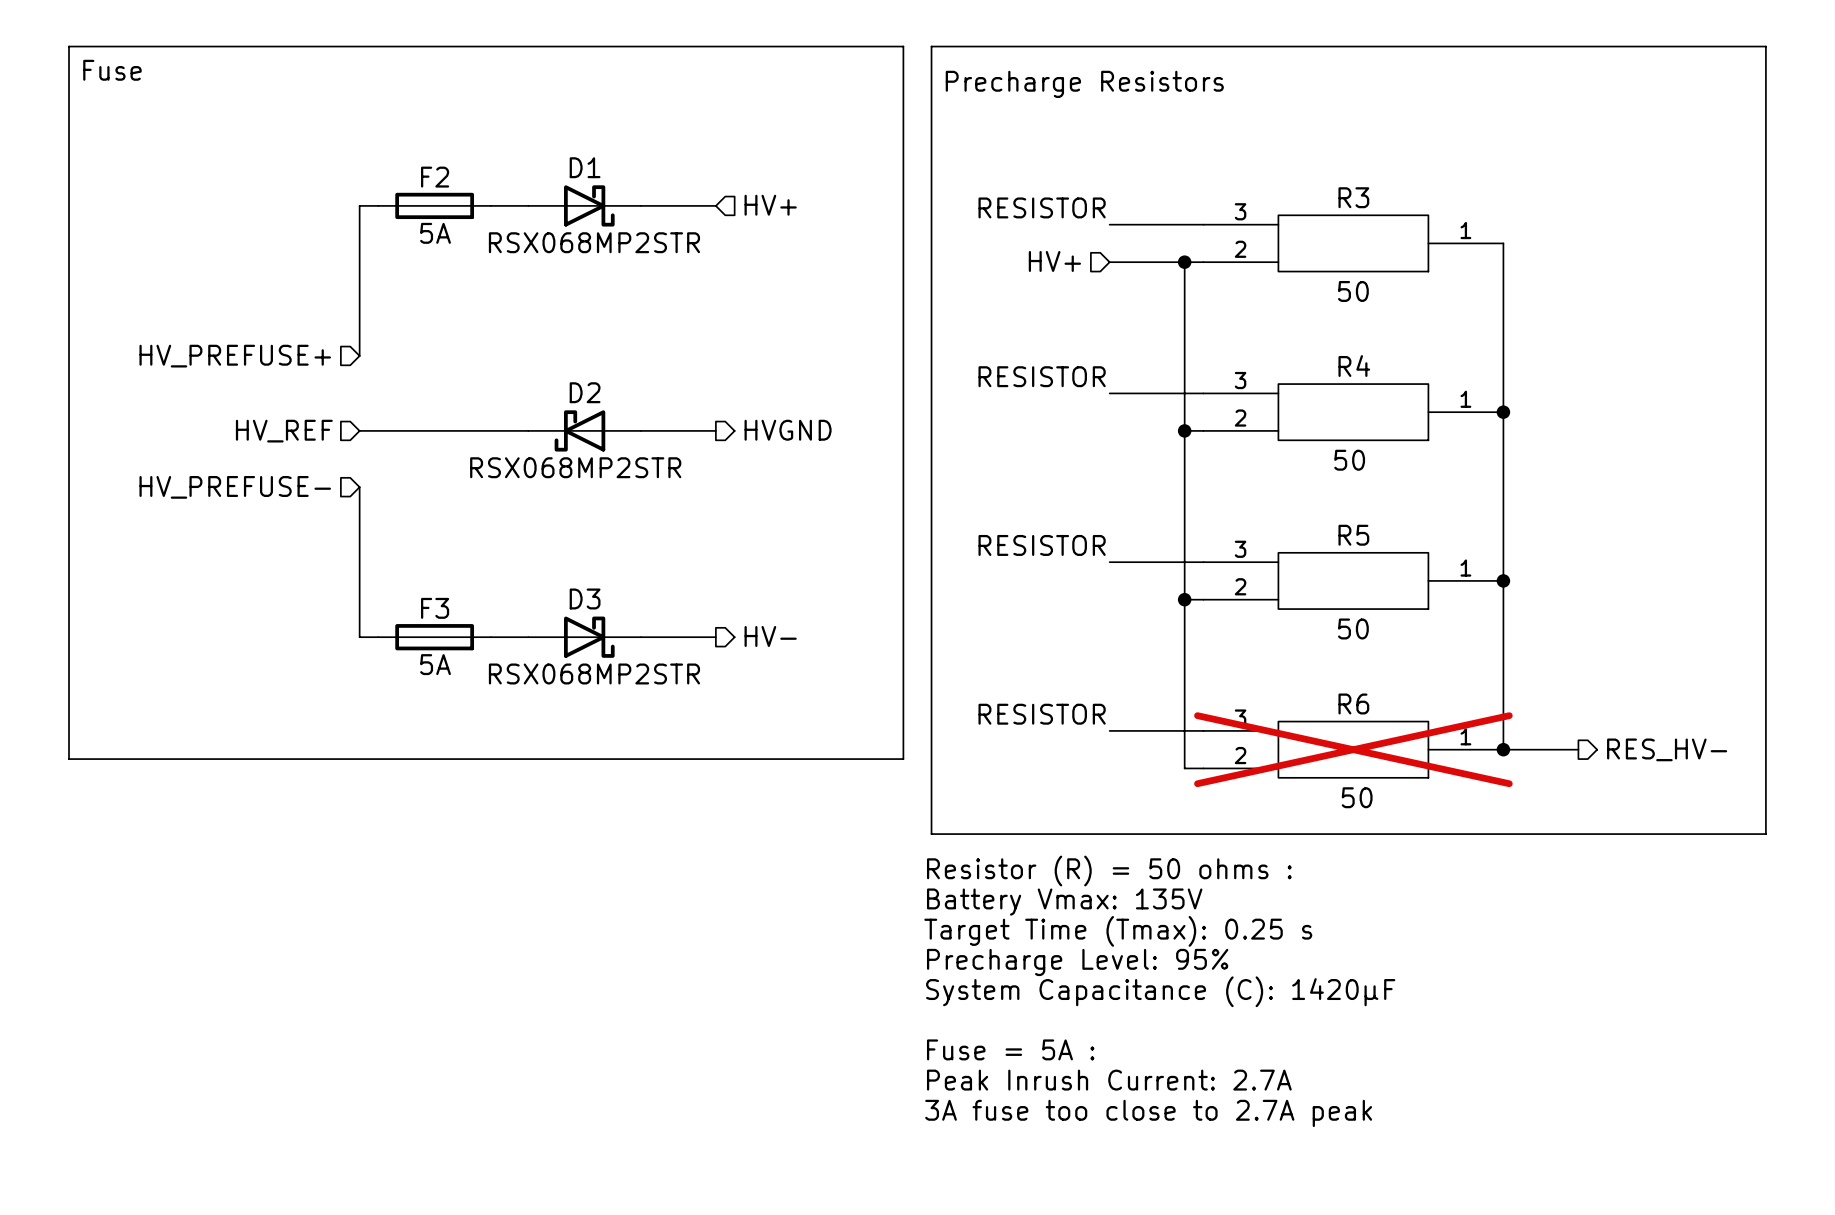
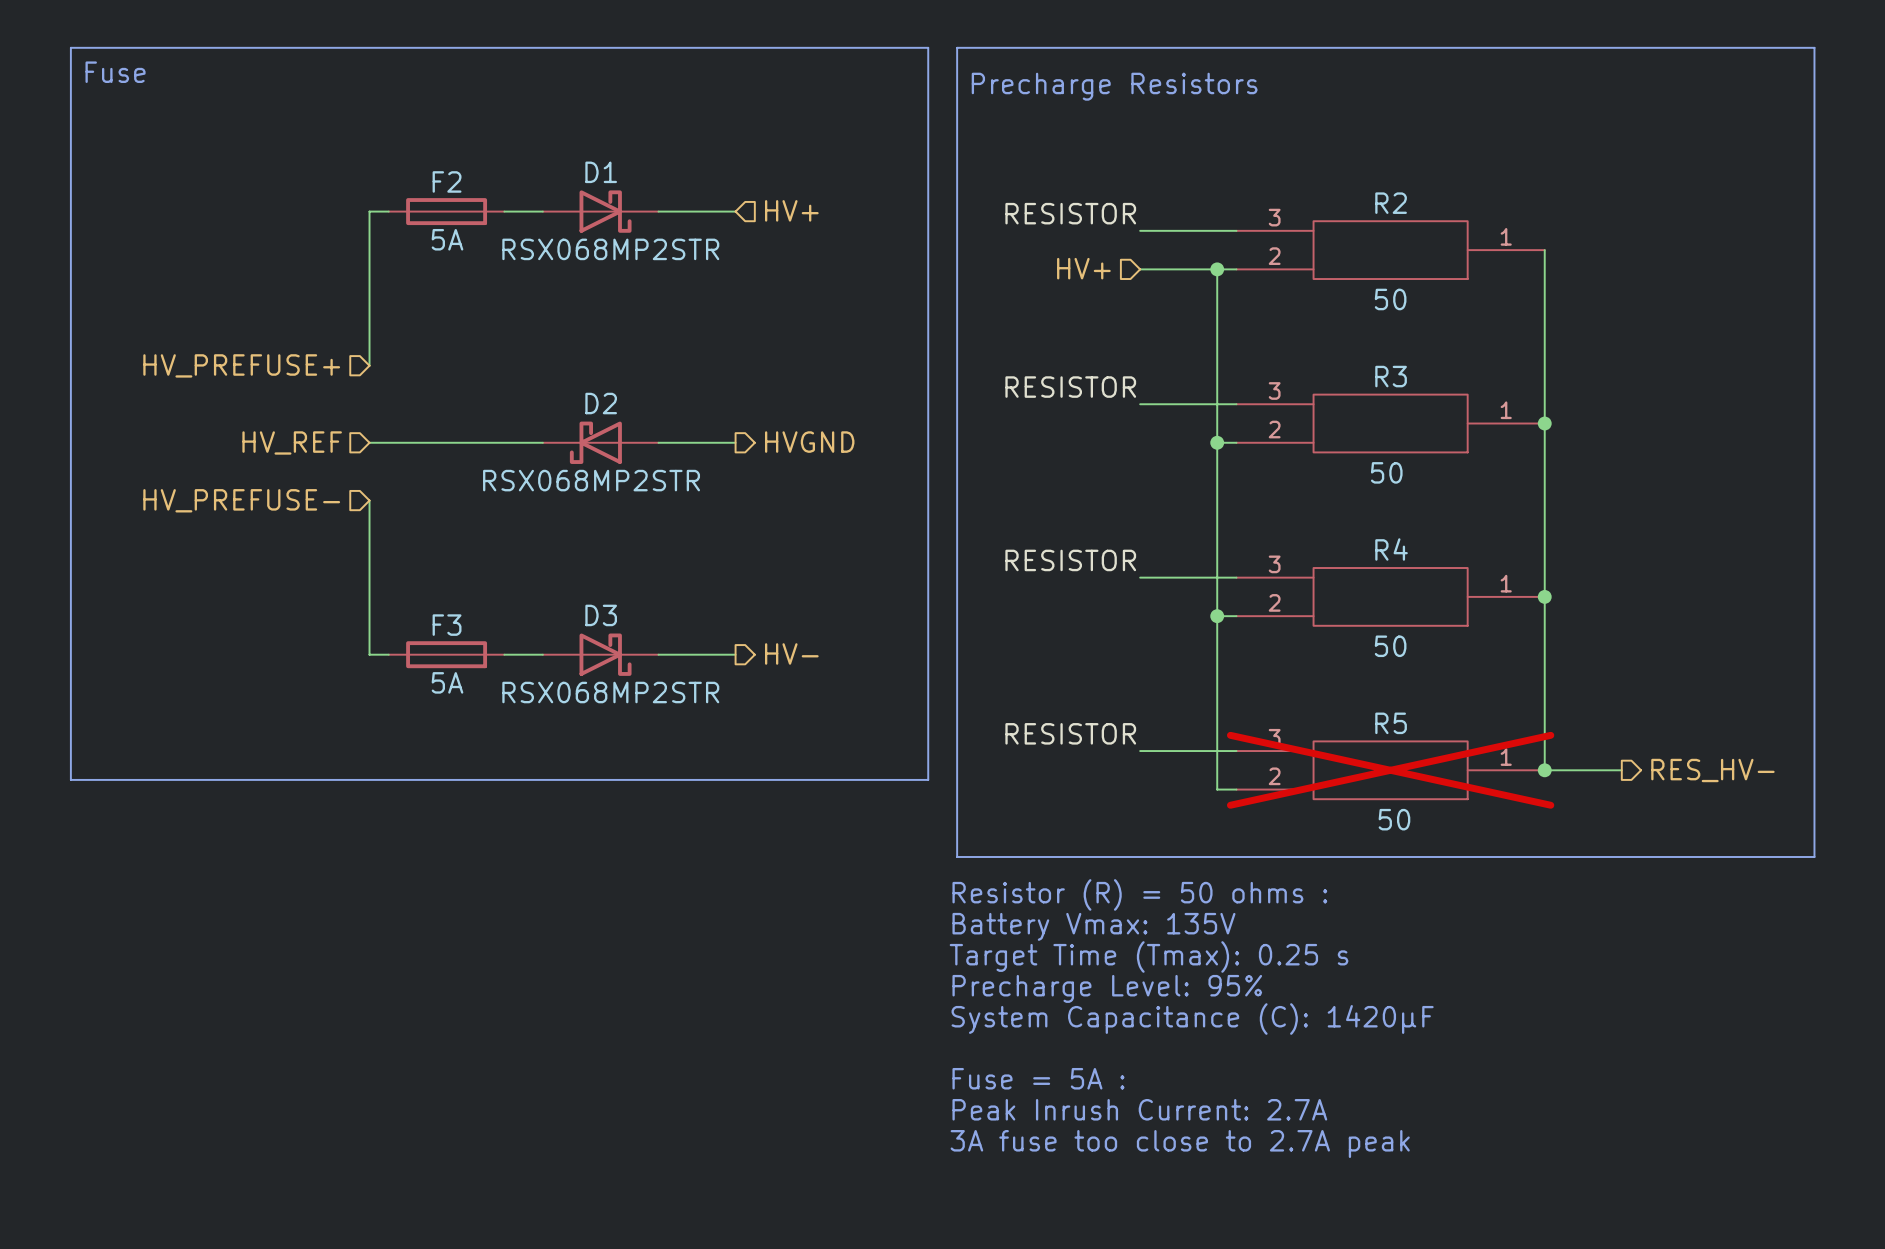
R3 name: R3 (1353, 197) -> R2 (1391, 203)
R4 name: R4 (1354, 366) -> R3 (1391, 376)
R5 name: R5 (1353, 535) -> R4 (1391, 549)
R6 name: R6 (1353, 703) -> R5 (1391, 723)

